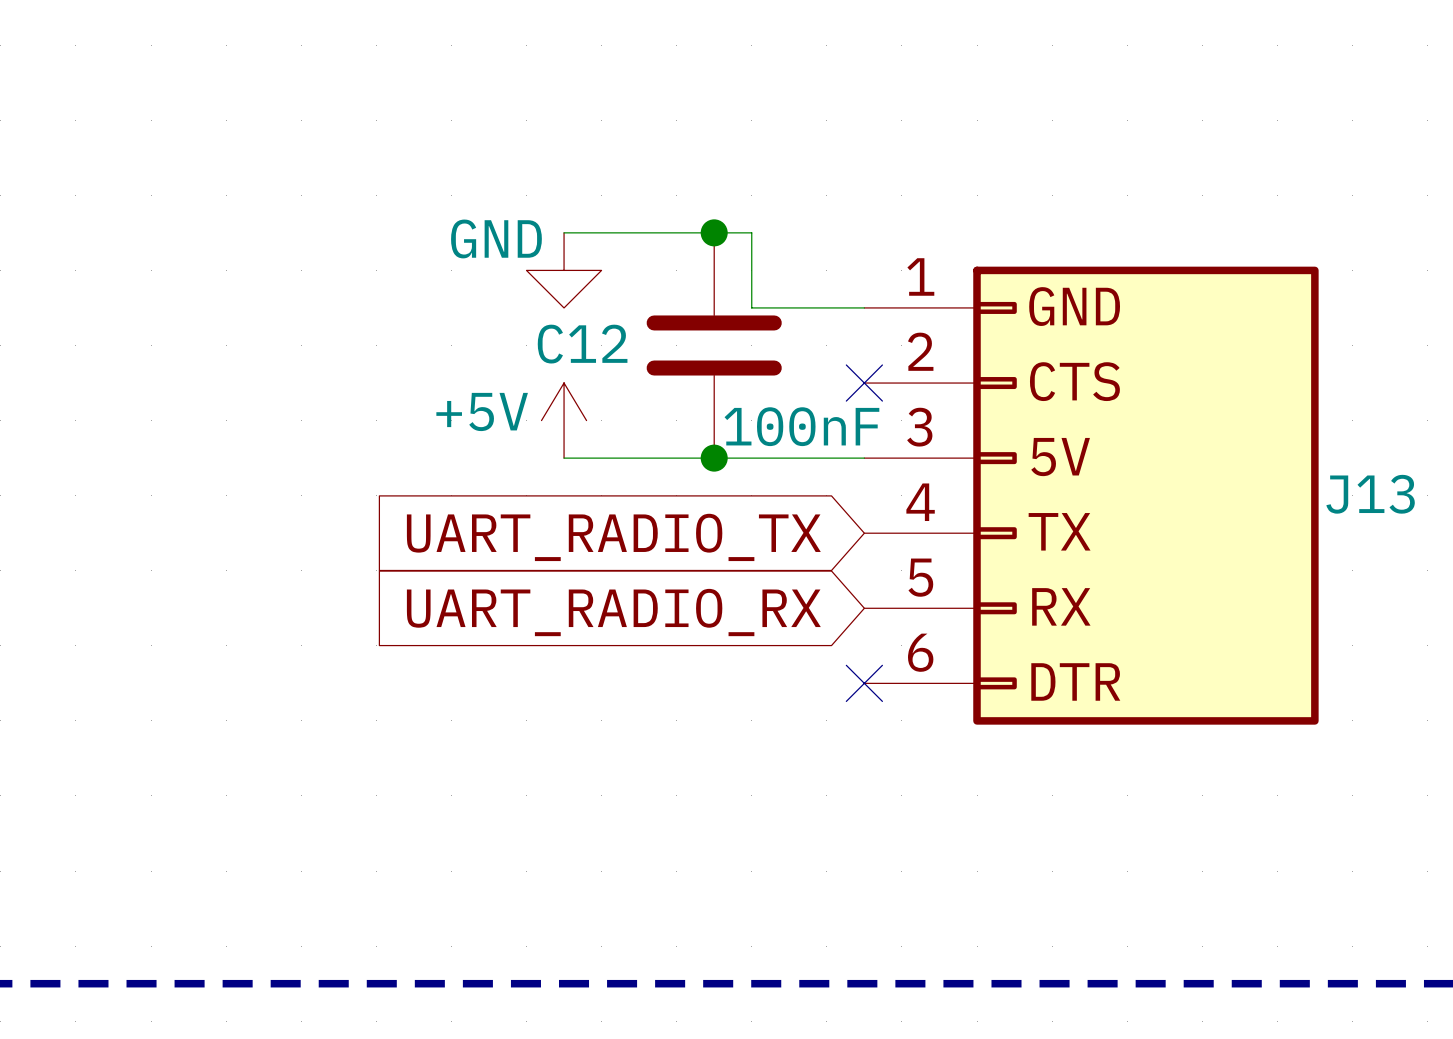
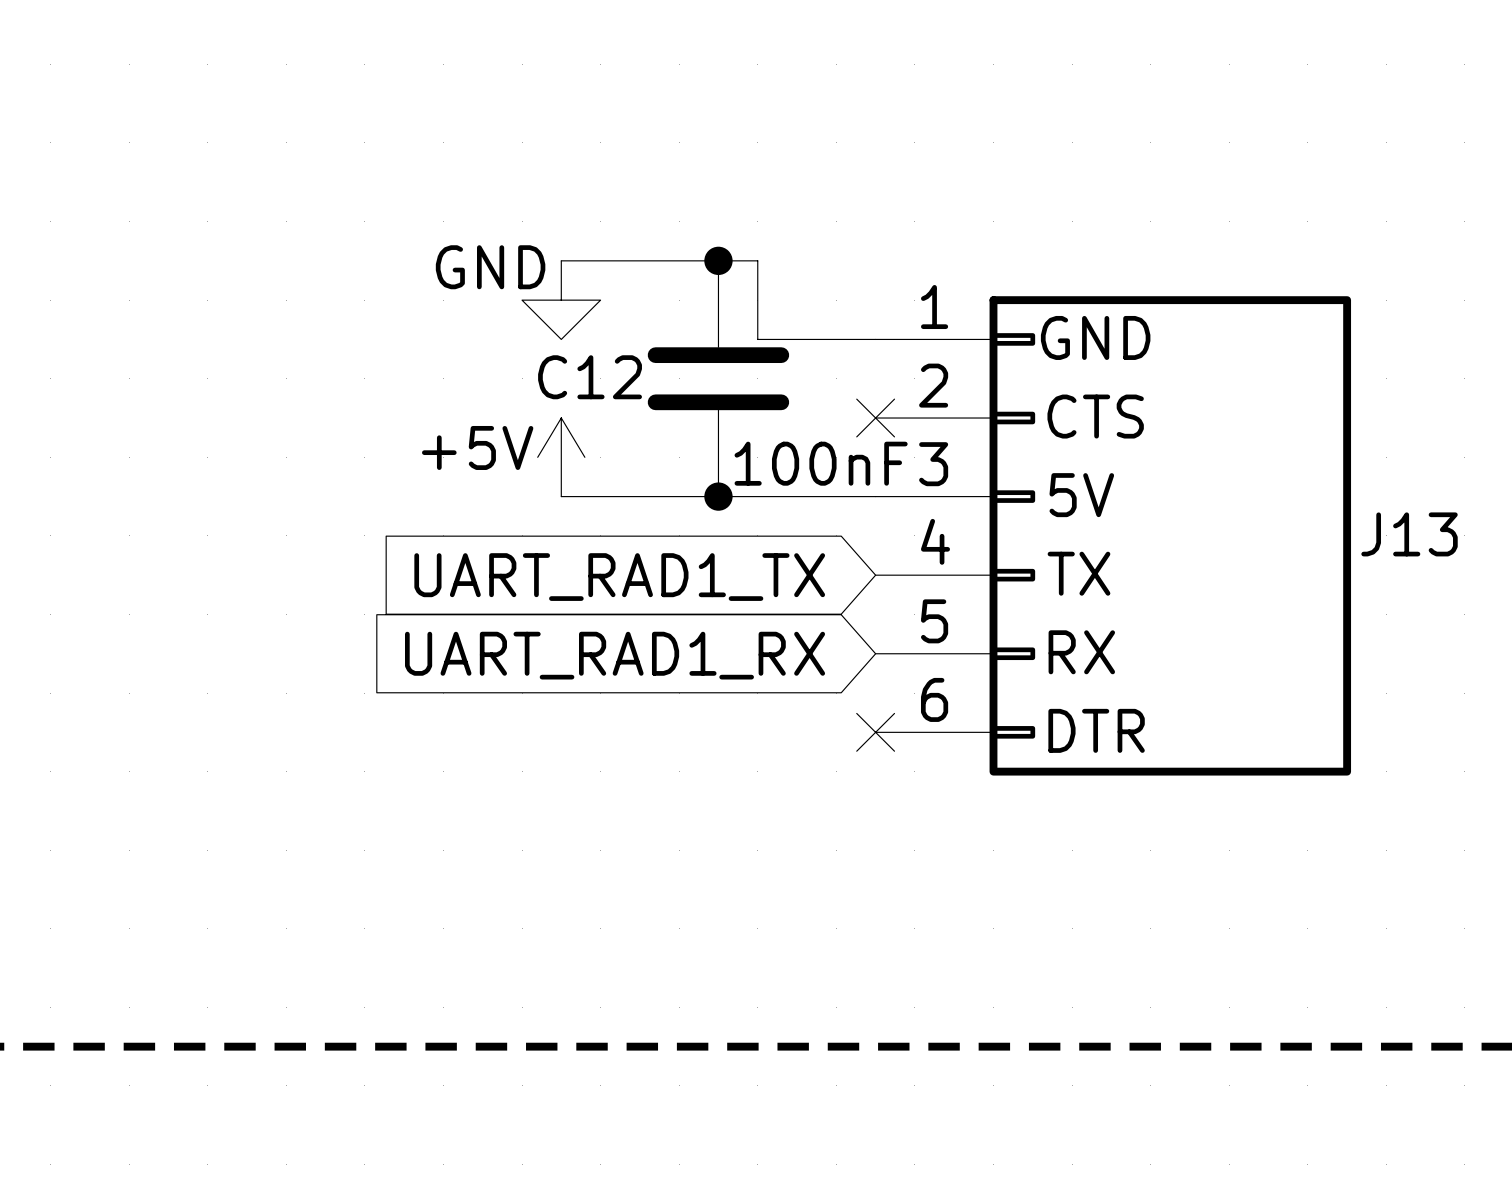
global label: UART_RADIO_TX (613, 537) -> UART_RAD1_TX (619, 577)
global label: UART_RADIO_RX (613, 612) -> UART_RAD1_RX (615, 655)

